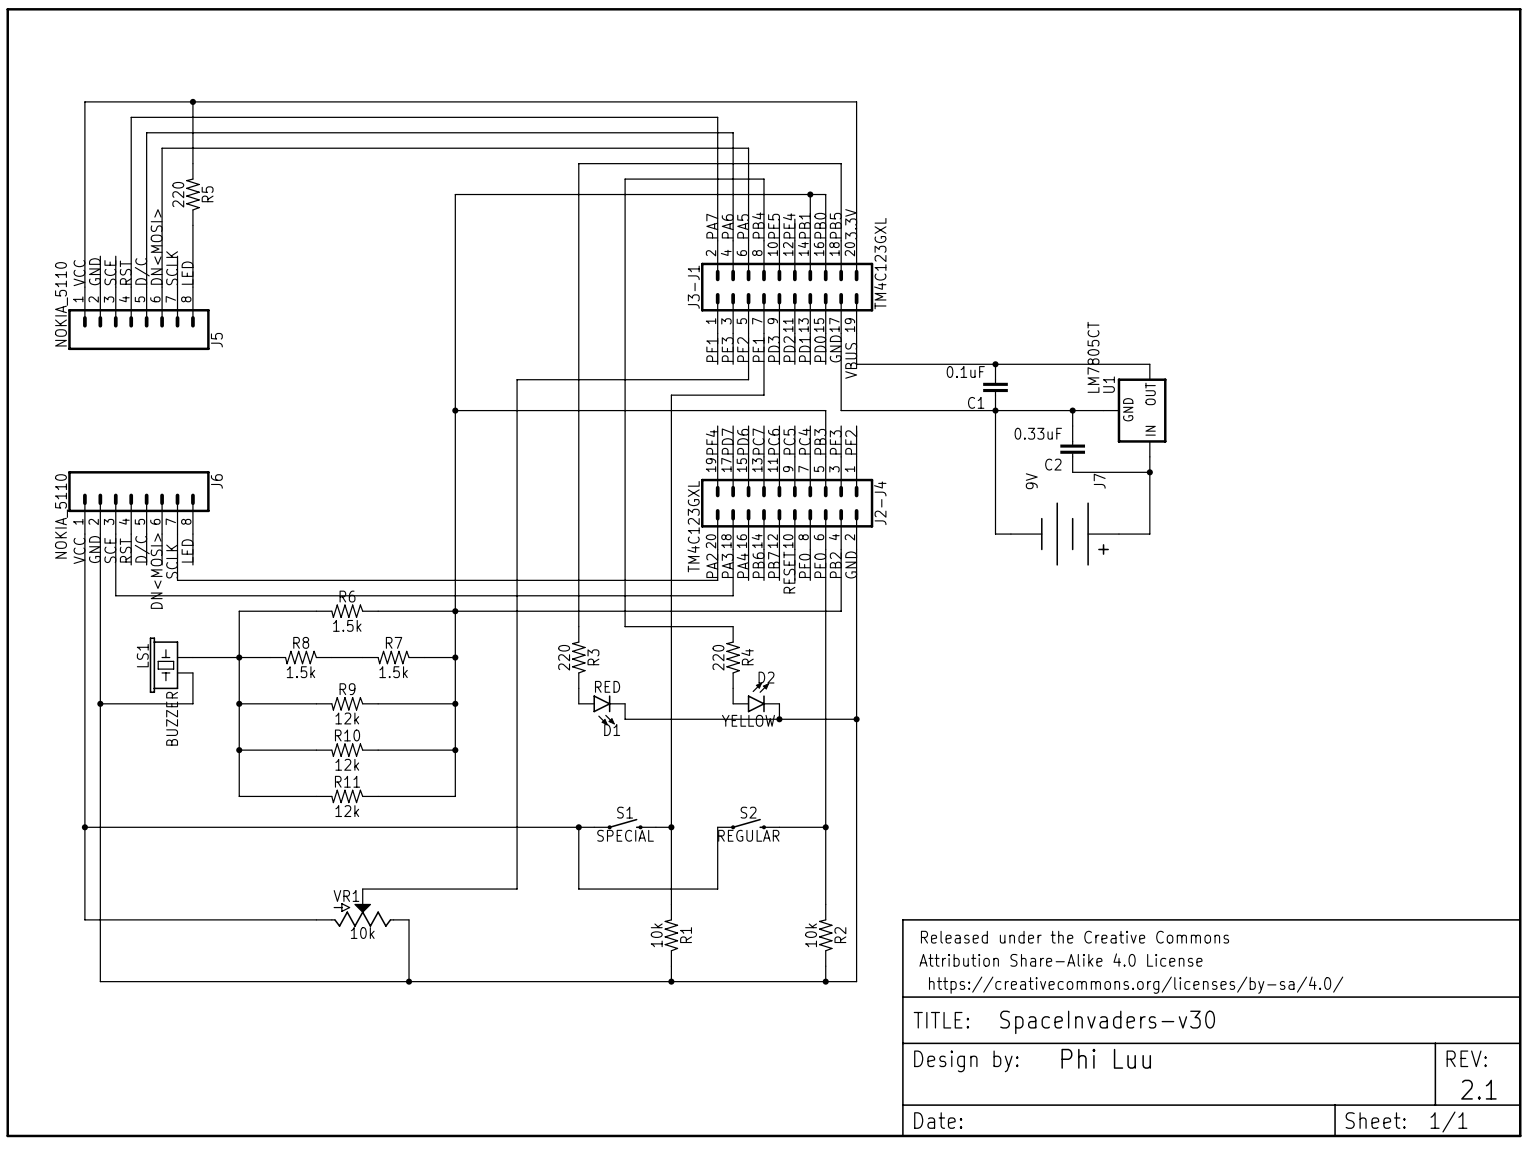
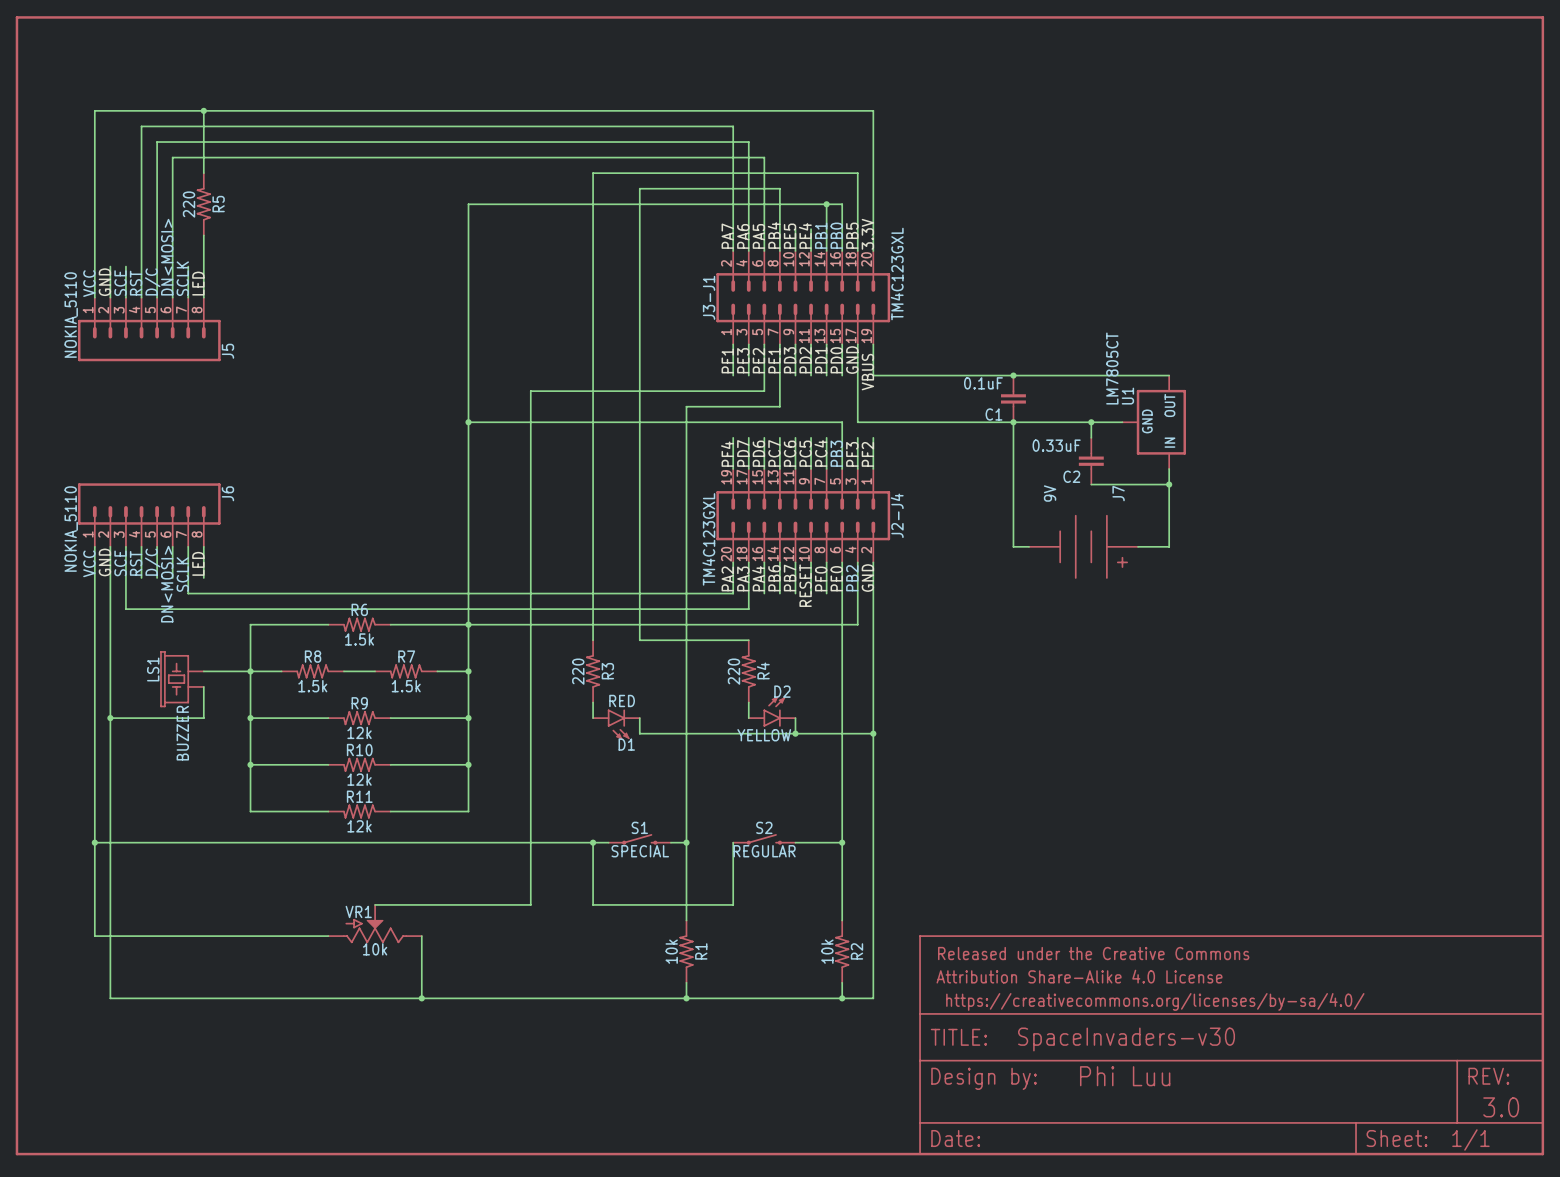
text: 2.1 (1478, 1089) -> 3.0 (1501, 1107)

